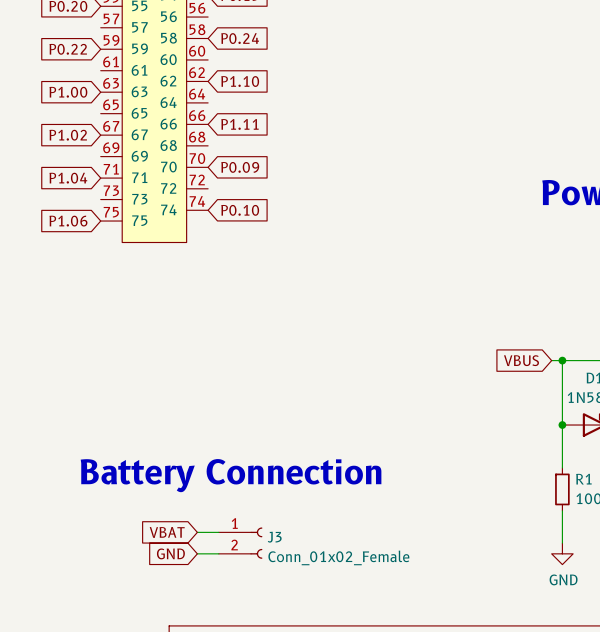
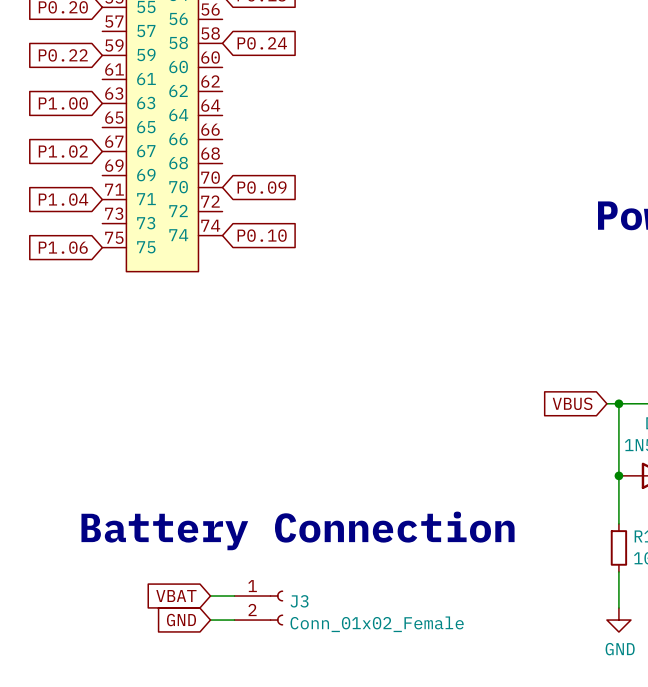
global label: P1.10 (240, 81) -> none
global label: P1.11 (239, 124) -> none

